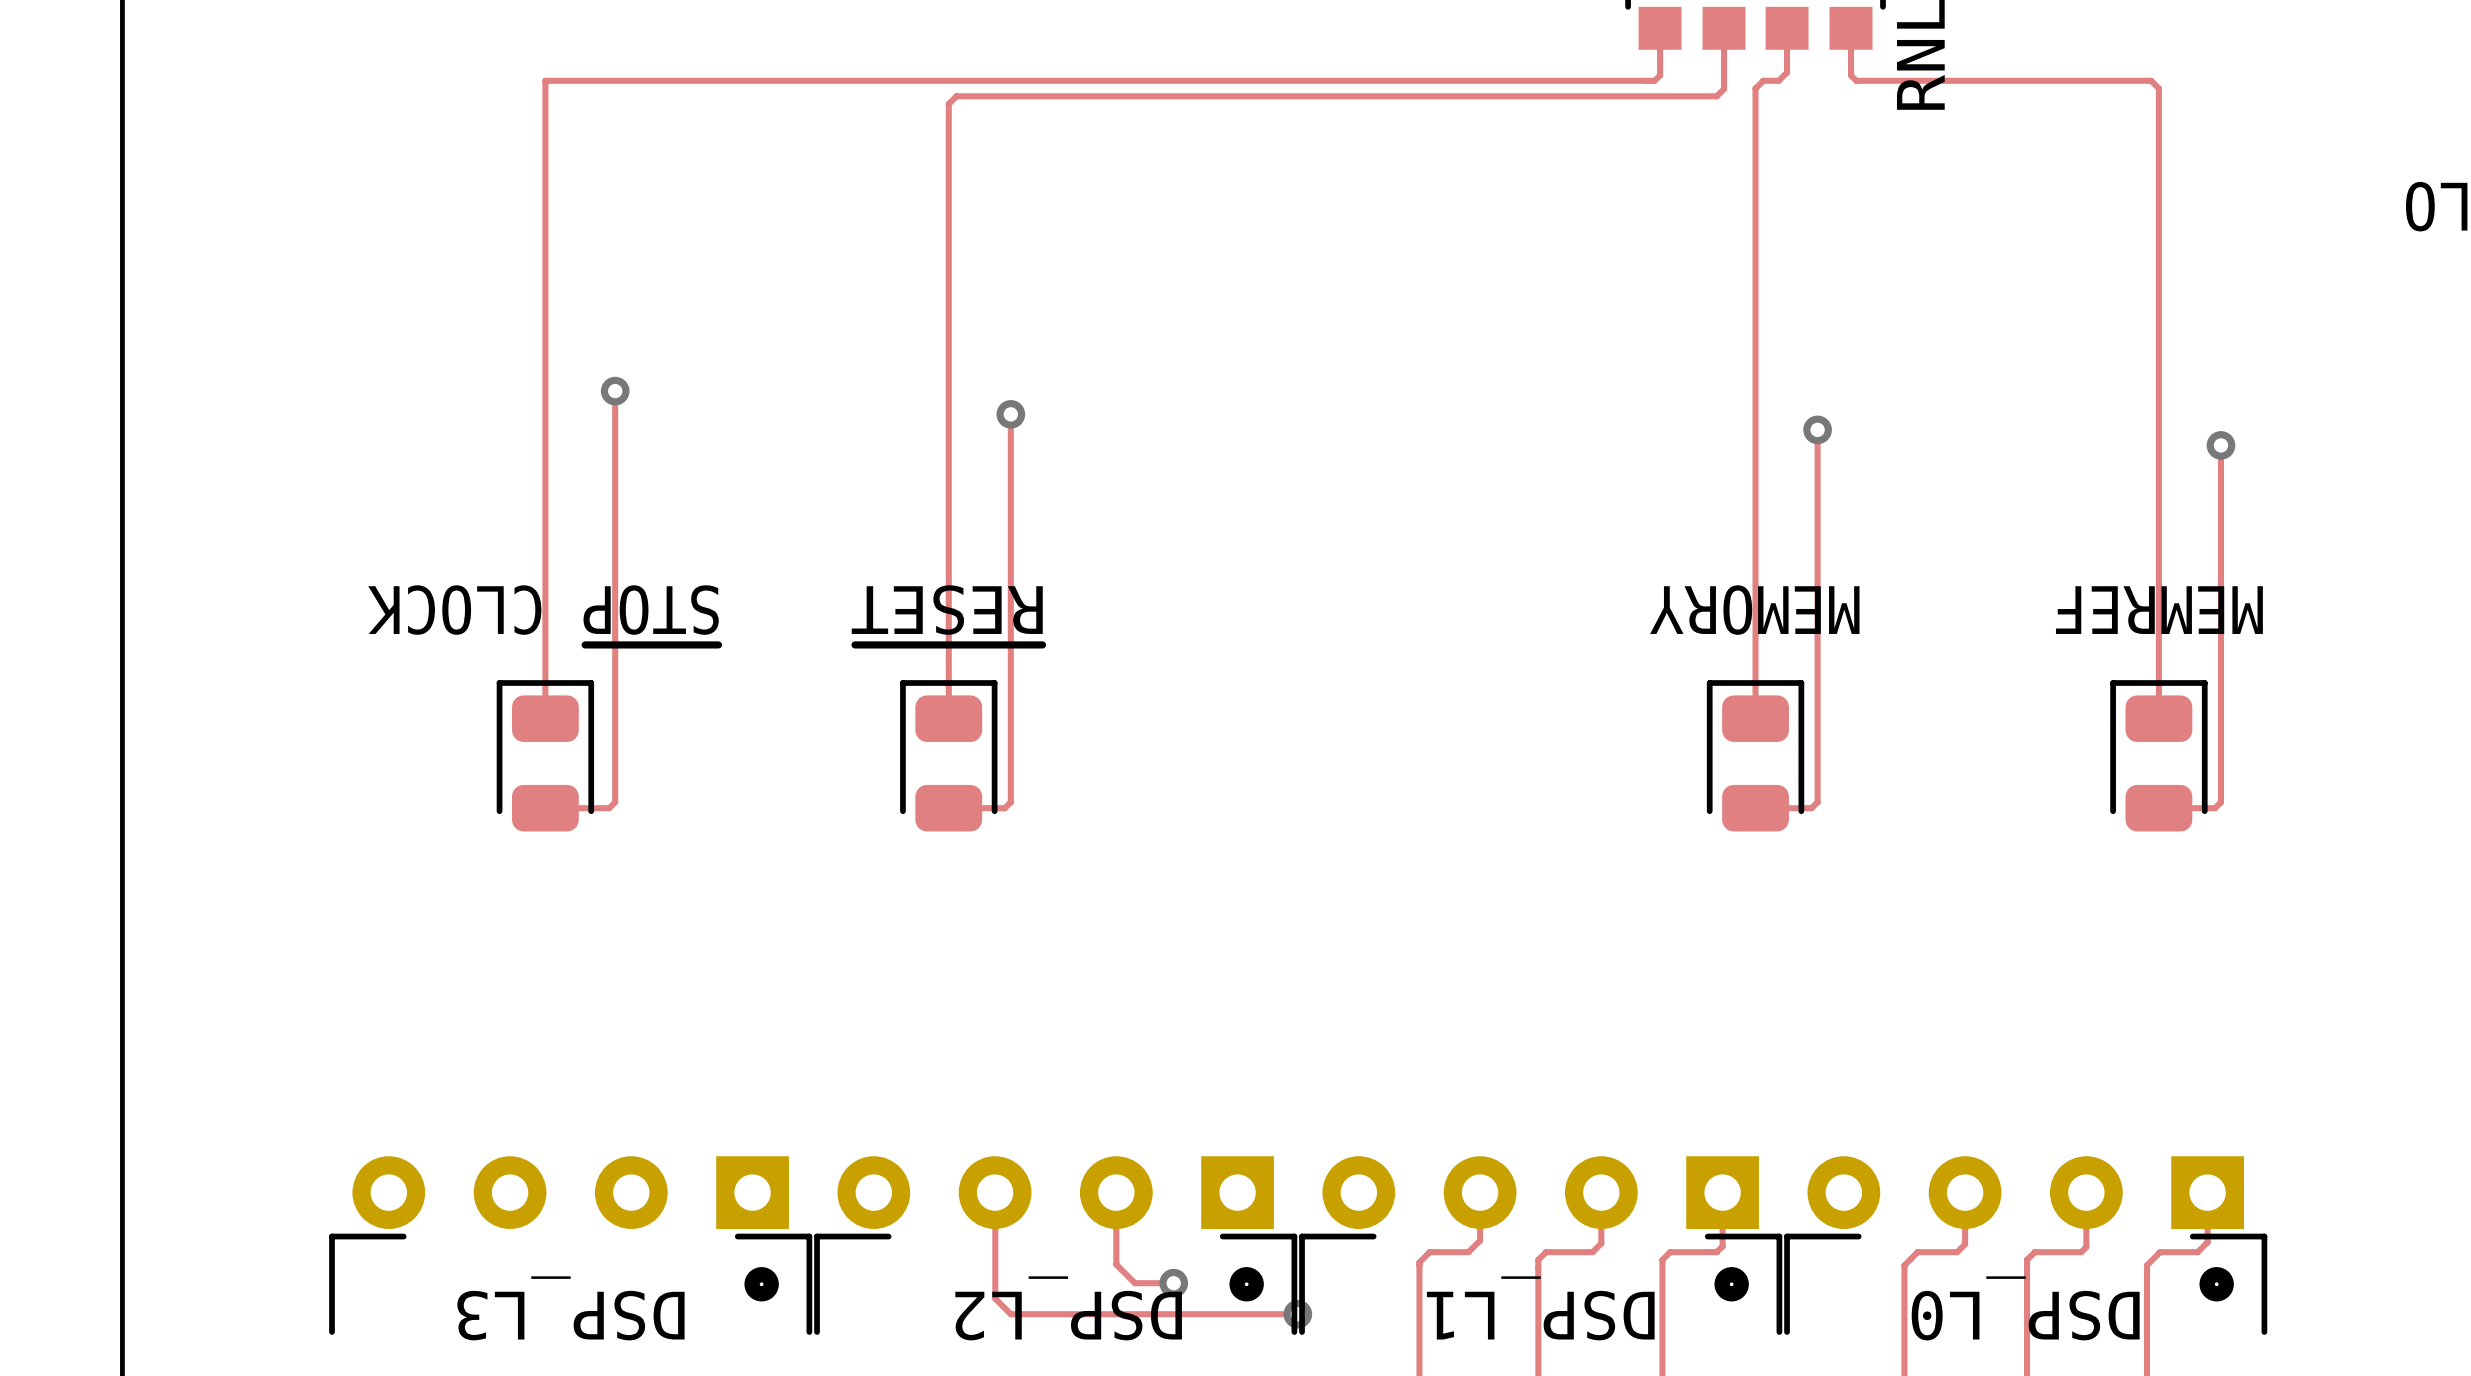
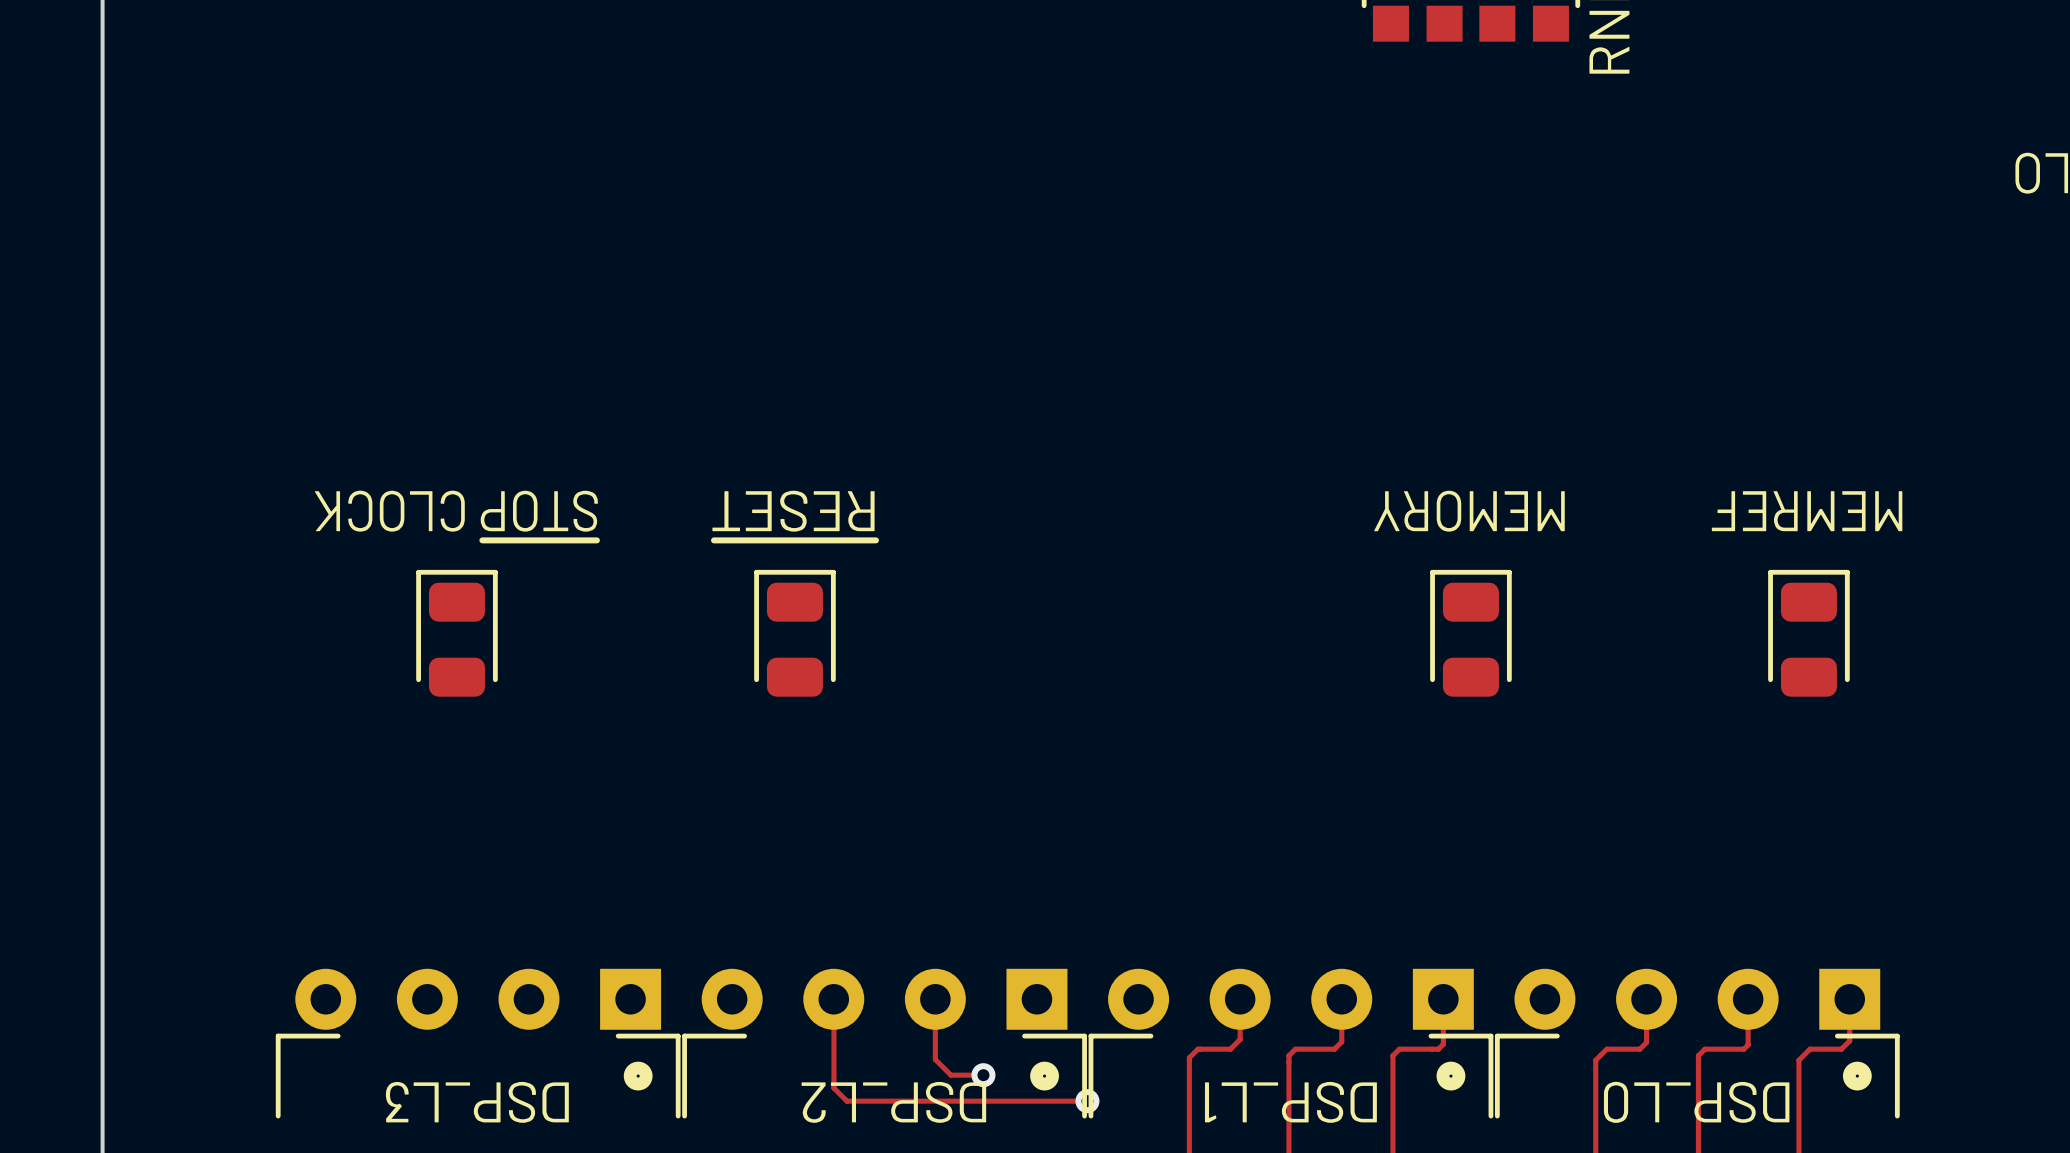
track: (1660, 28) (1660, 75) (1654, 80) (545, 80) (545, 718) -> none
track: (1724, 28) (1724, 89) (1716, 96) (956, 96) (948, 104) (948, 718) -> none
track: (1787, 28) (1787, 72) (1778, 80) (1763, 80) (1755, 88) (1755, 718) -> none
track: (1851, 28) (1851, 75) (1856, 80) (2151, 80) (2158, 88) (2158, 718) -> none
track: (615, 391) (615, 802) (609, 808) (545, 808) -> none
via: (615, 391) -> none
track: (1010, 414) (1010, 802) (1004, 808) (948, 808) -> none
via: (1010, 414) -> none
track: (1817, 429) (1817, 802) (1811, 808) (1755, 808) -> none
via: (1817, 429) -> none
track: (2220, 445) (2220, 802) (2215, 808) (2158, 808) -> none
via: (2220, 445) -> none

